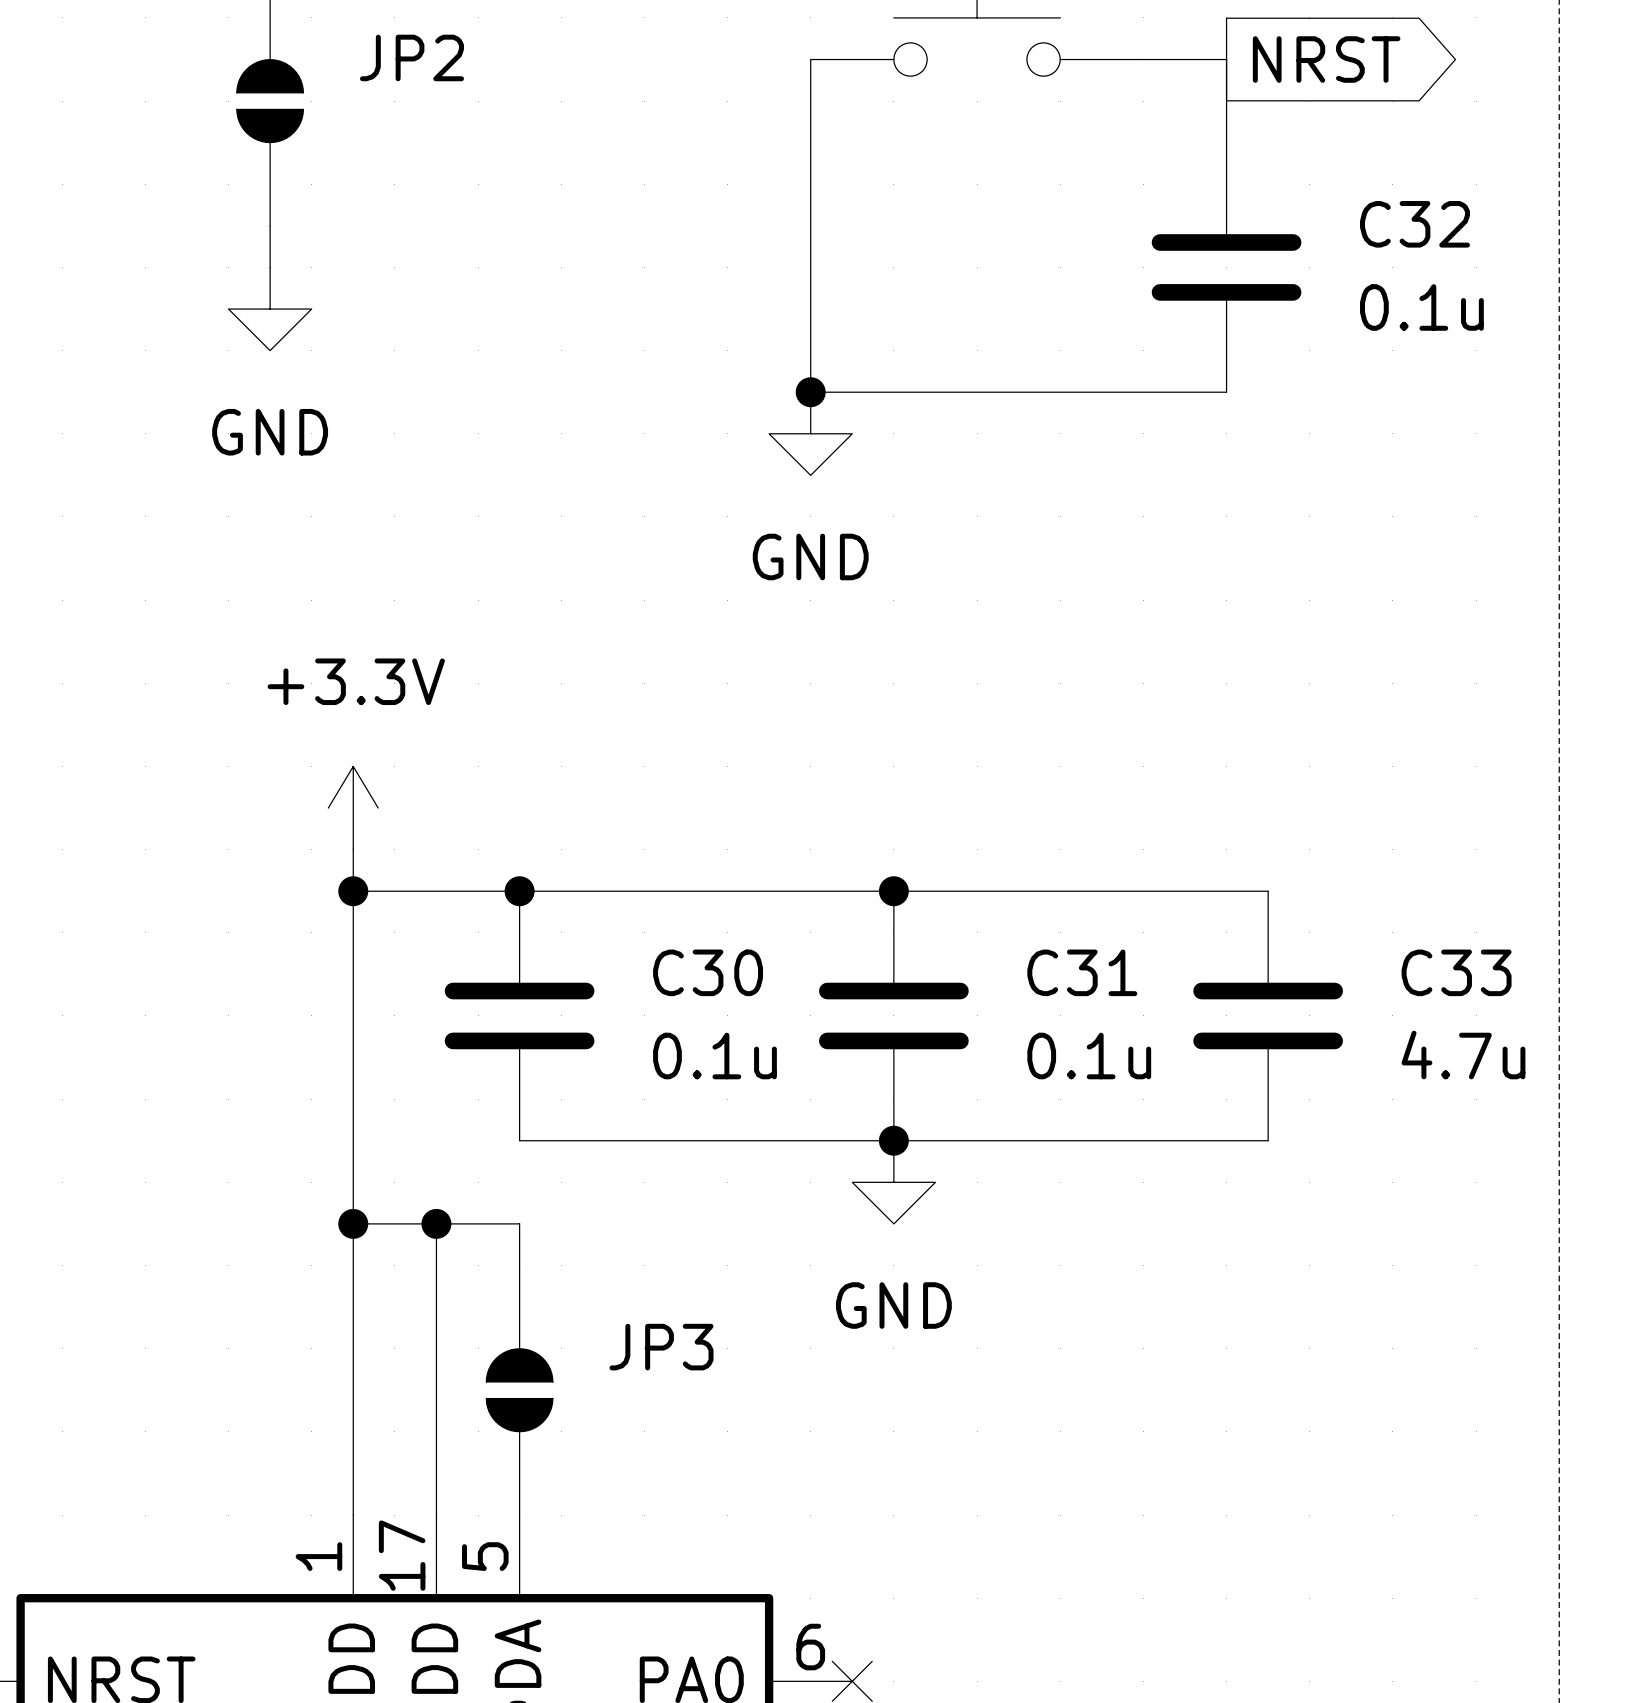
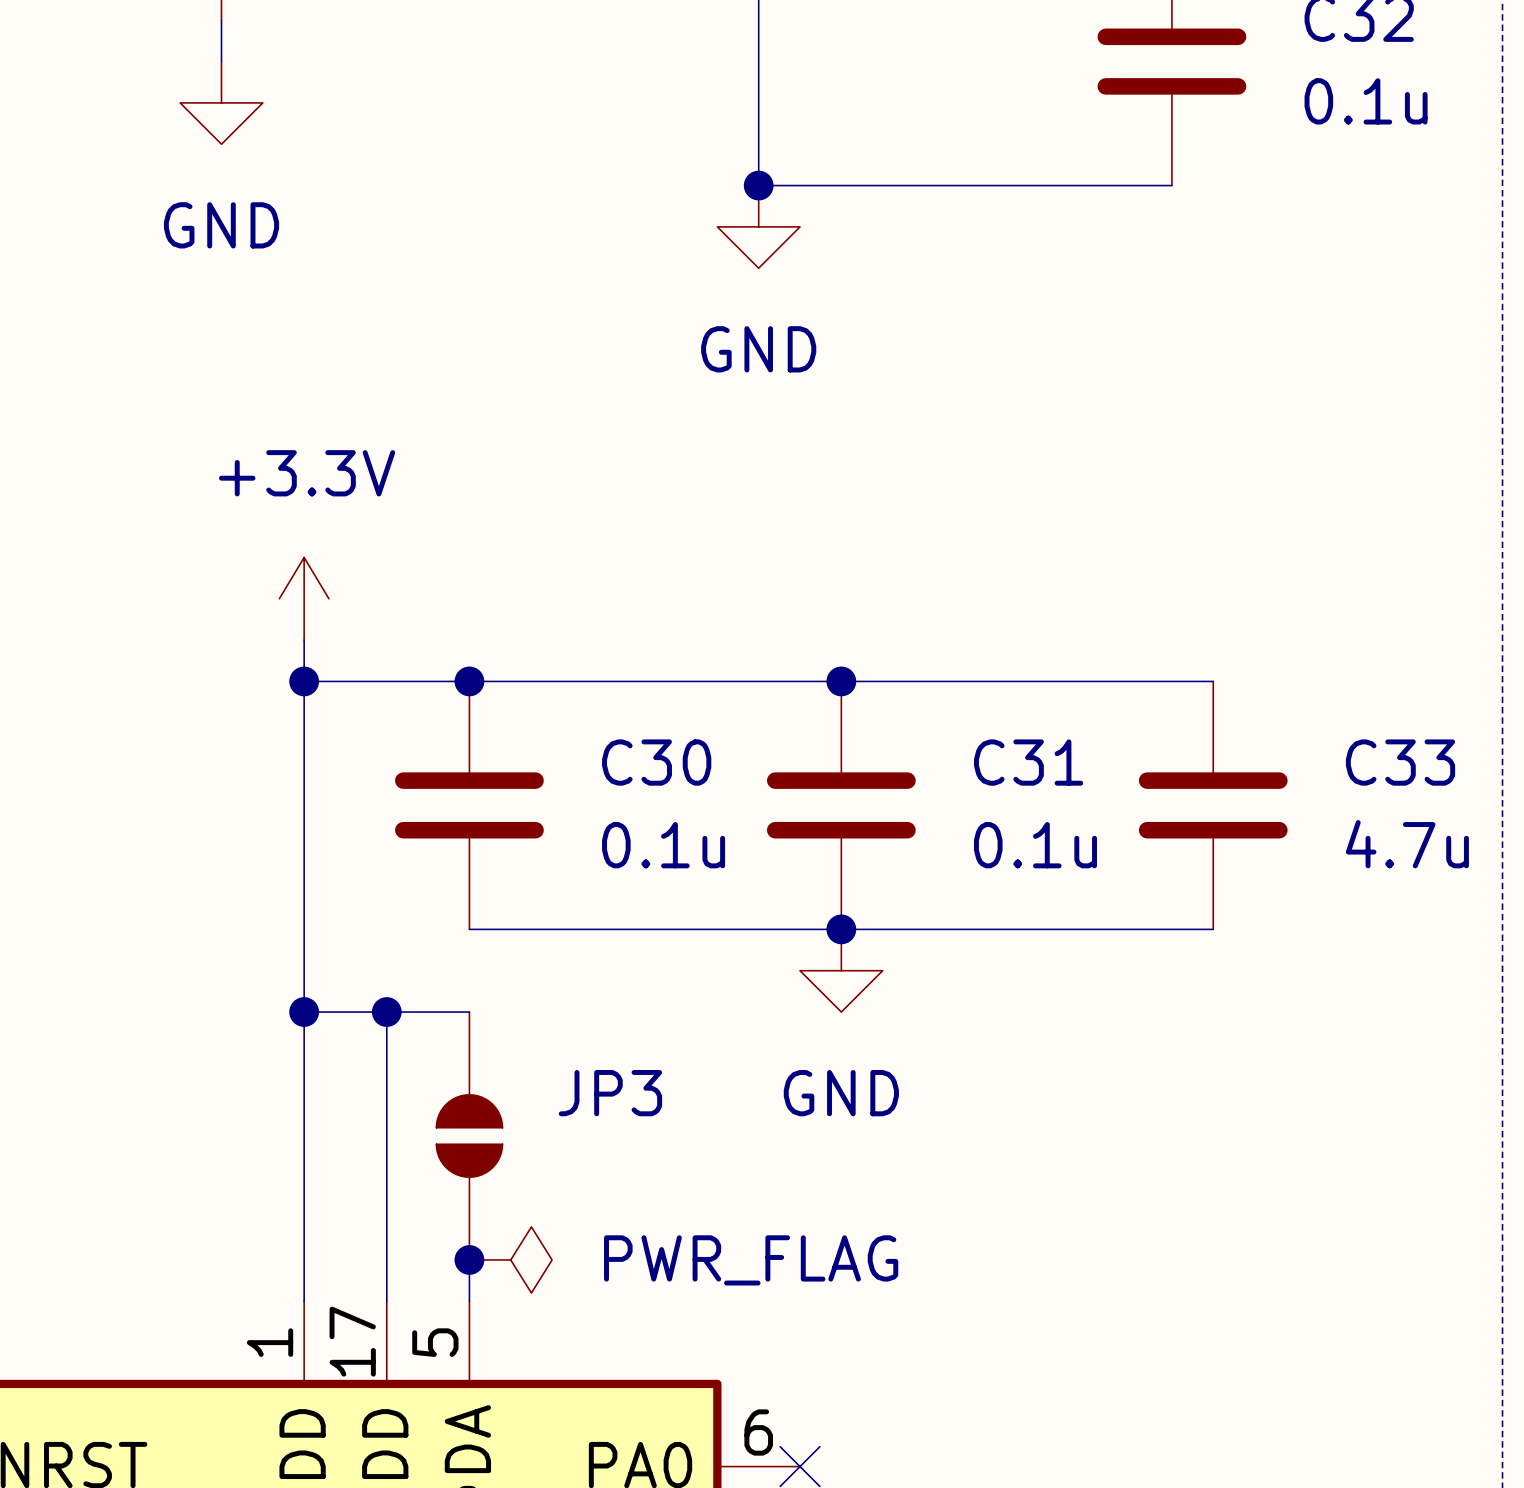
JP3 position: (519, 1390) -> (469, 1136)
junction: none -> (469, 1259)
power symbol: none -> PWR_FLAG (510, 1259)

